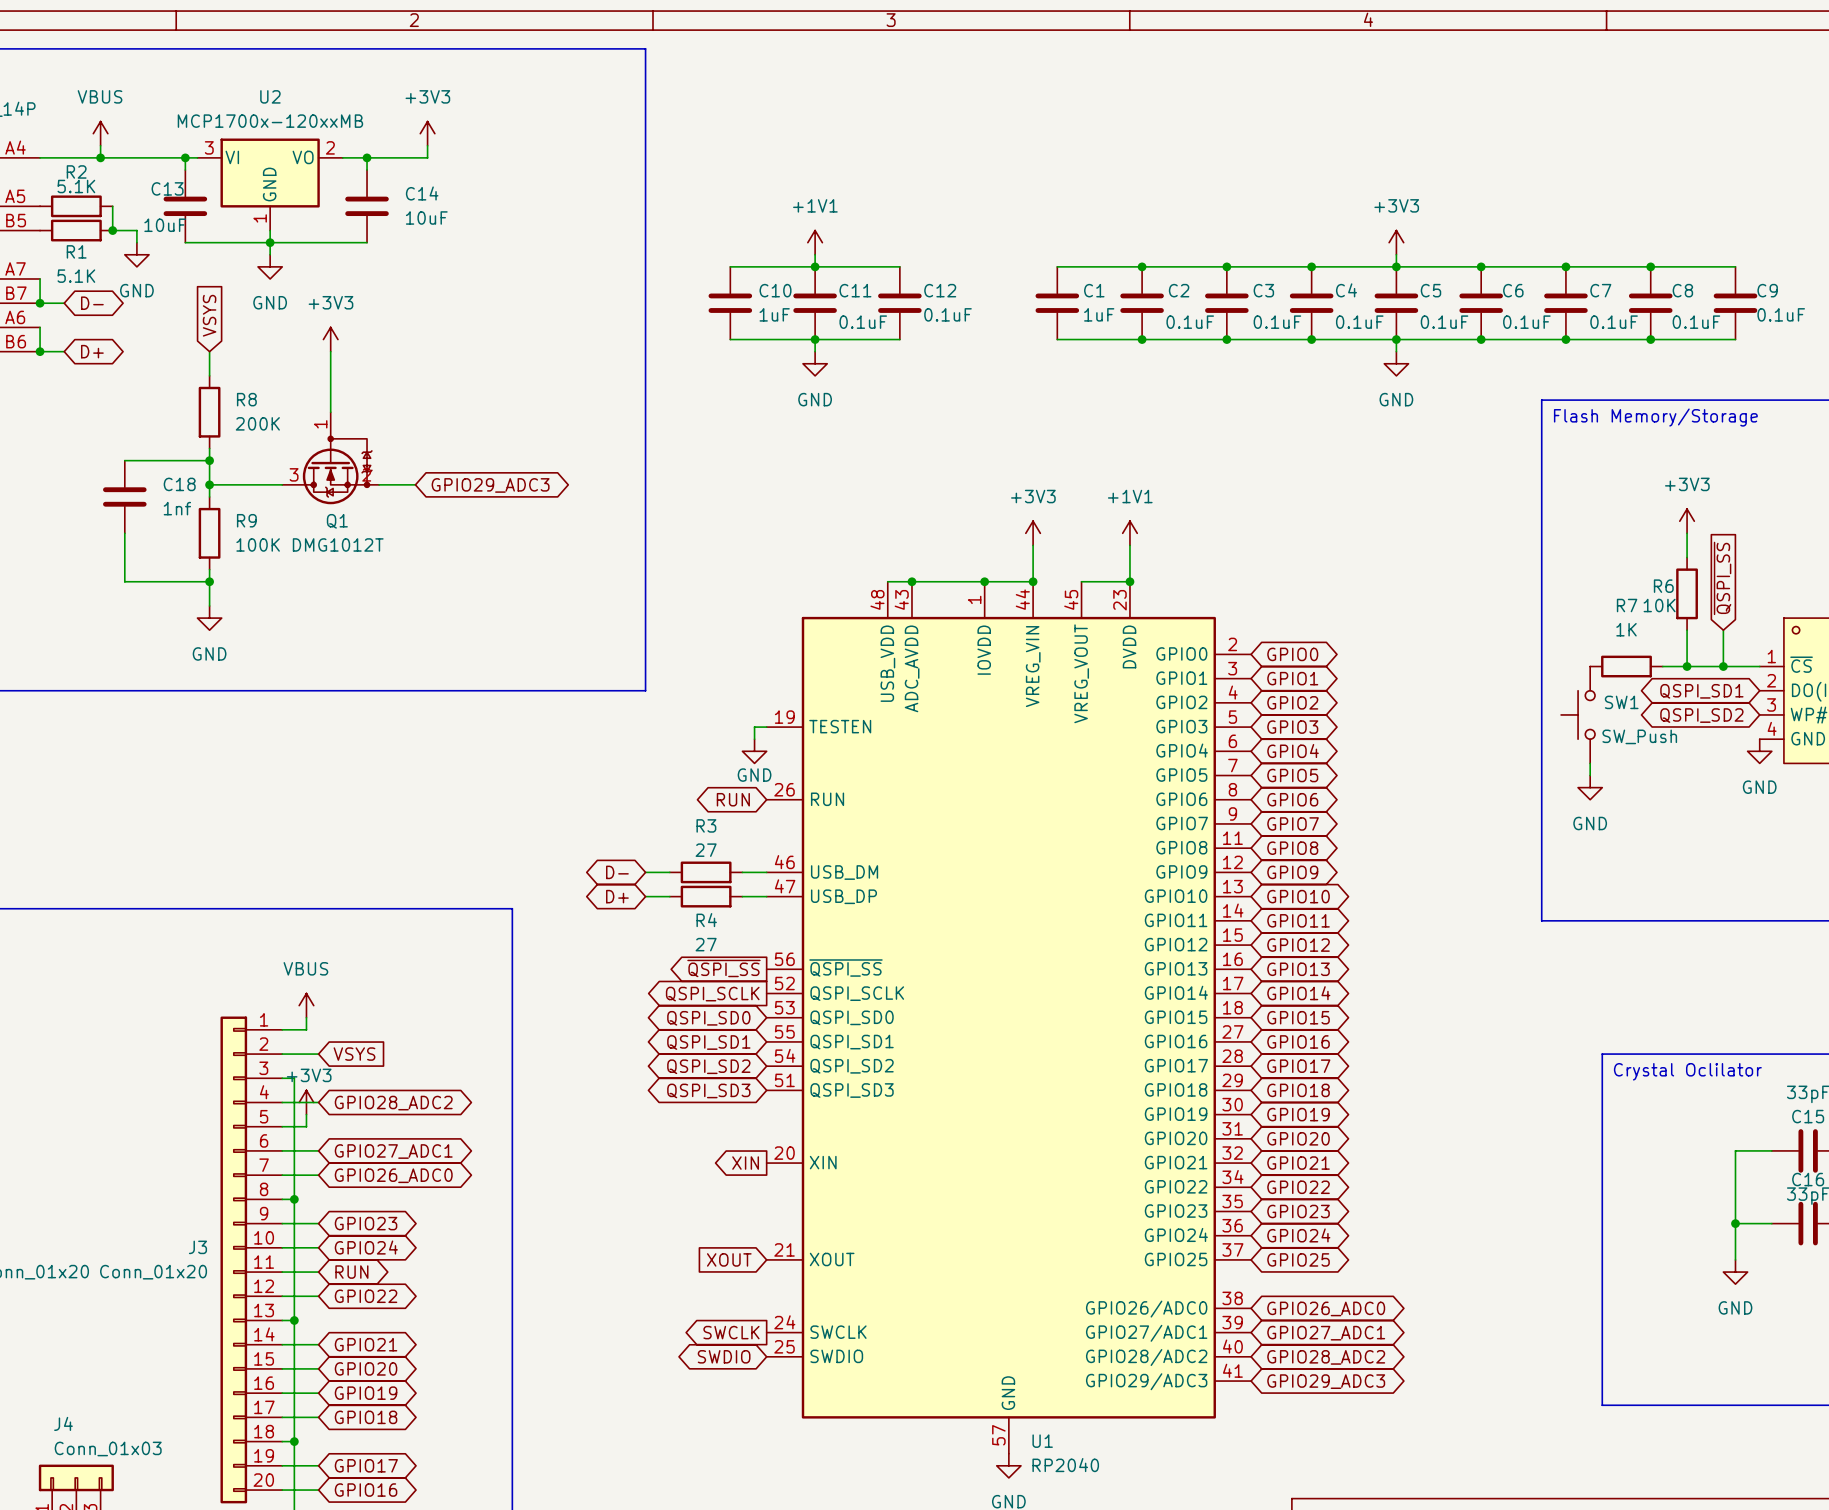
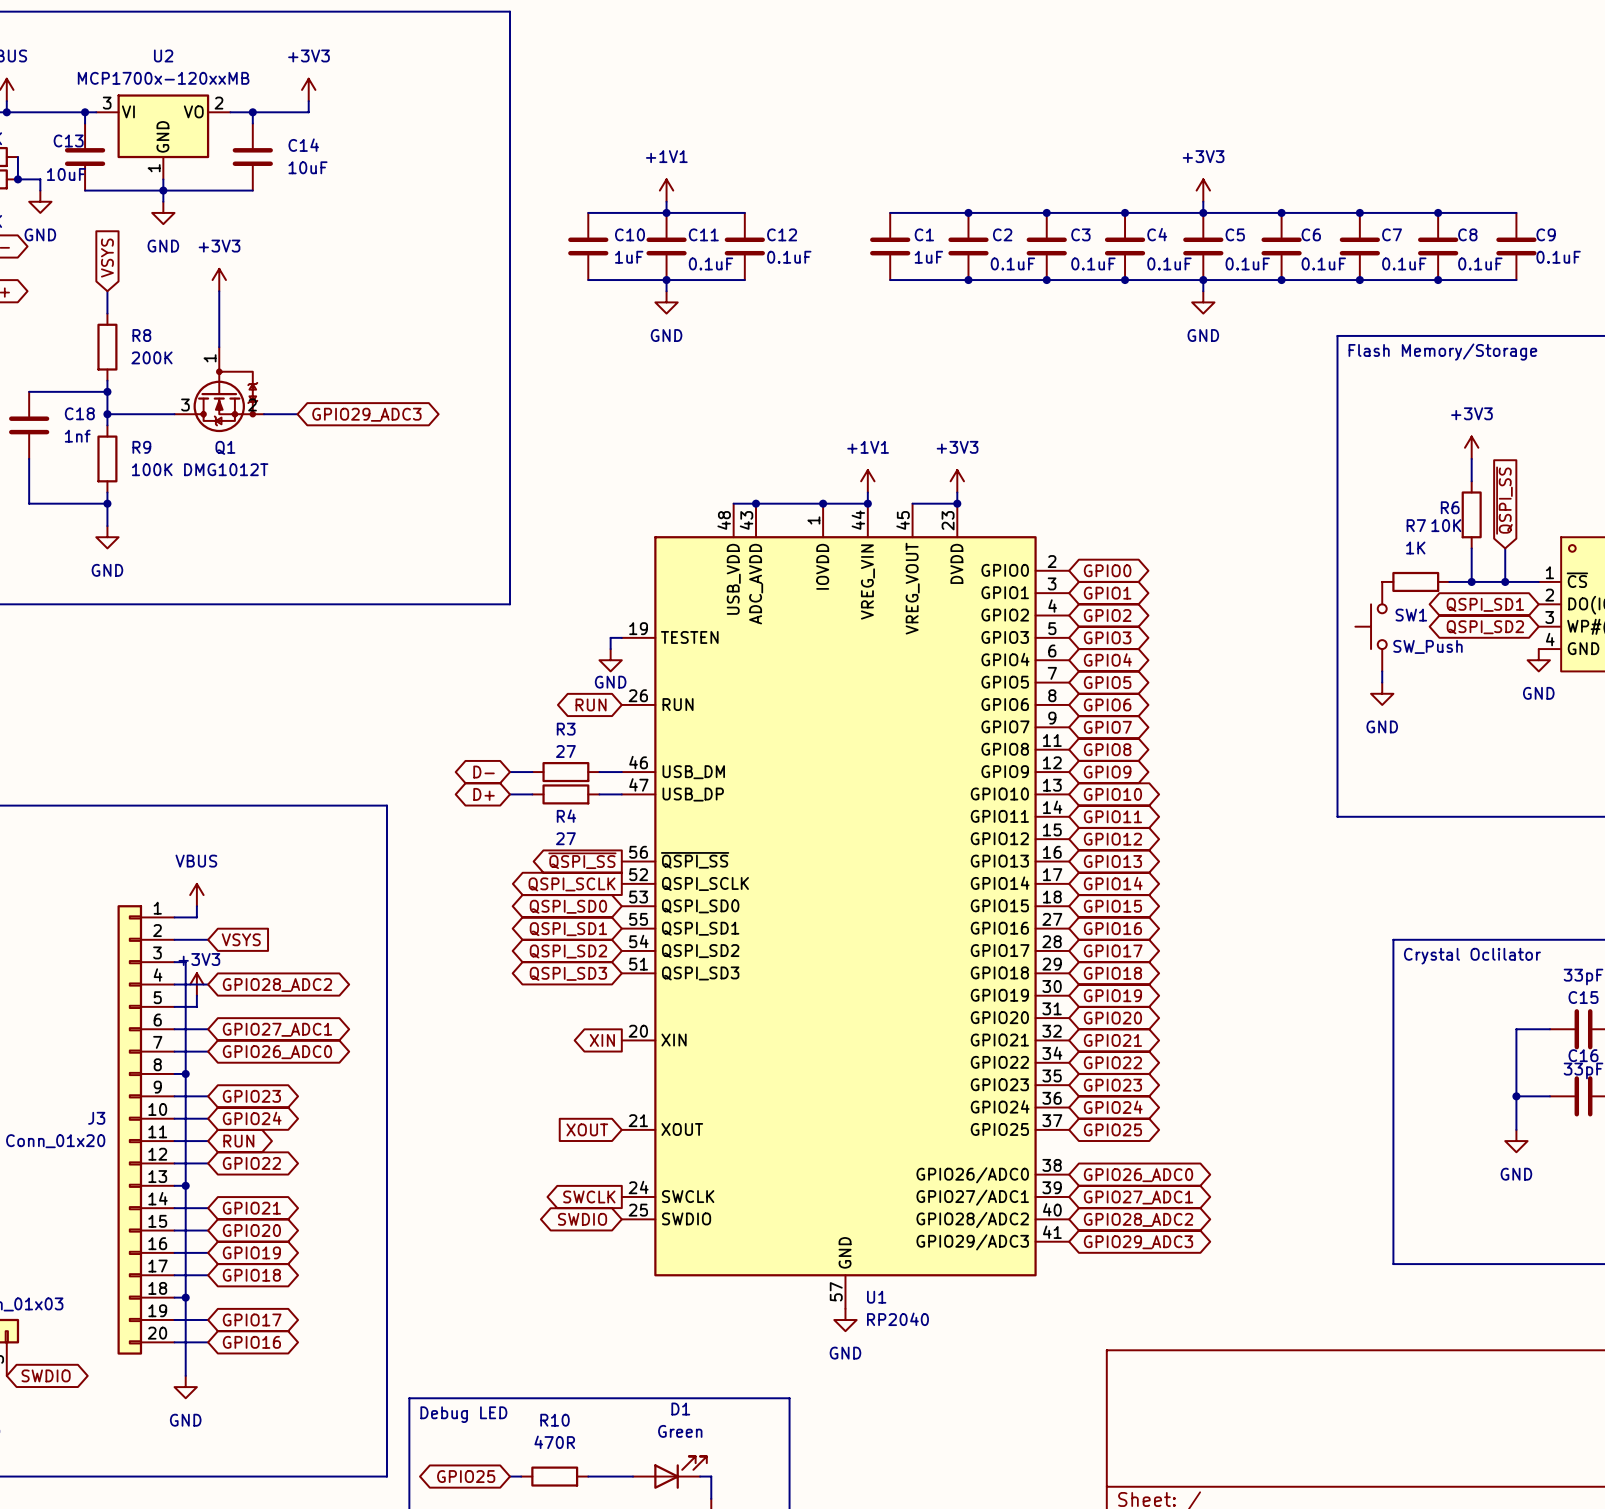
power symbol position: +3V3 (1033, 533) -> +3V3 (957, 481)
power symbol position: +1V1 (1129, 533) -> +1V1 (867, 481)

